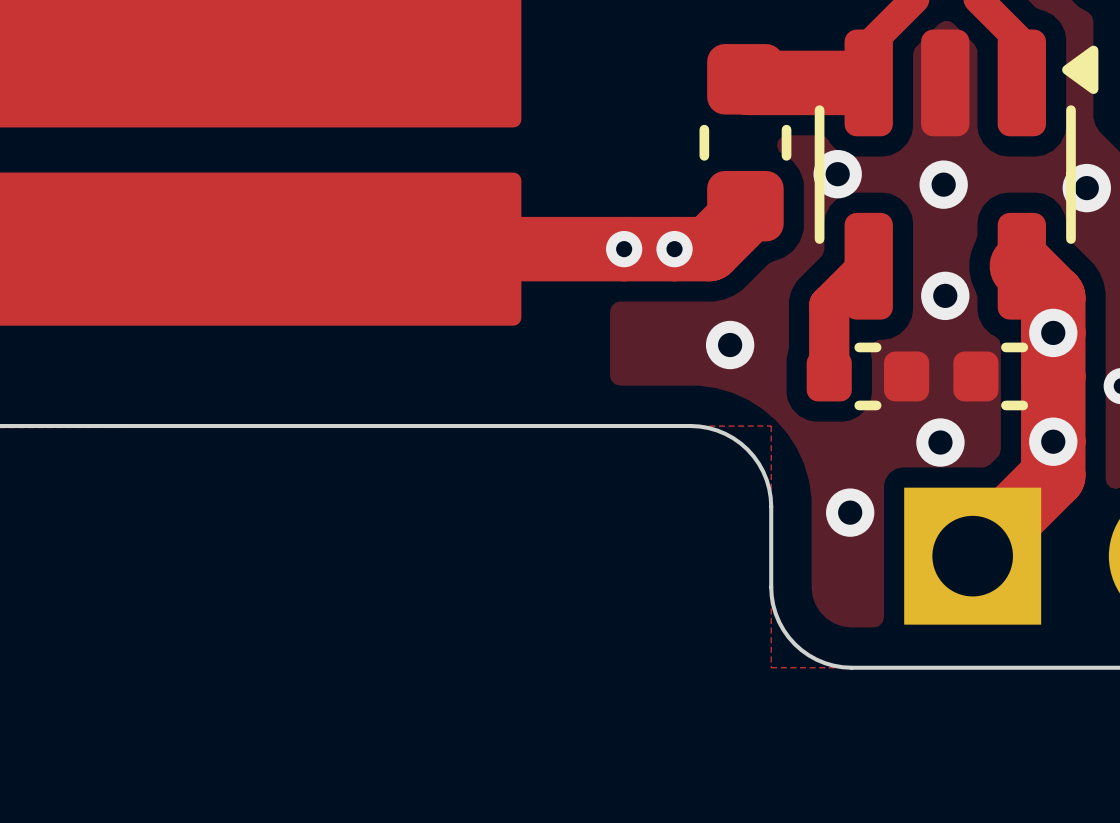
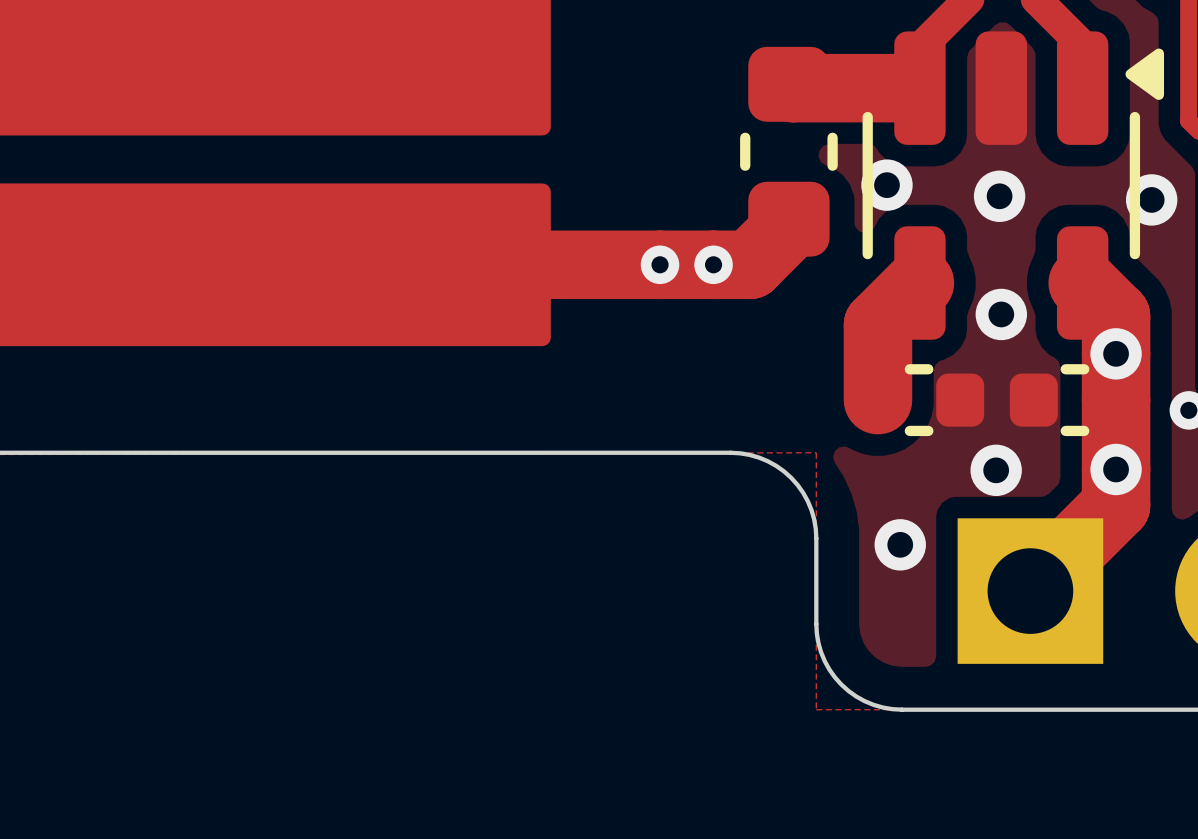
track width: thin (868, 266) (829, 305) (829, 376) -> thick (919, 282) (877, 324) (877, 400)
via: (730, 345) -> none

